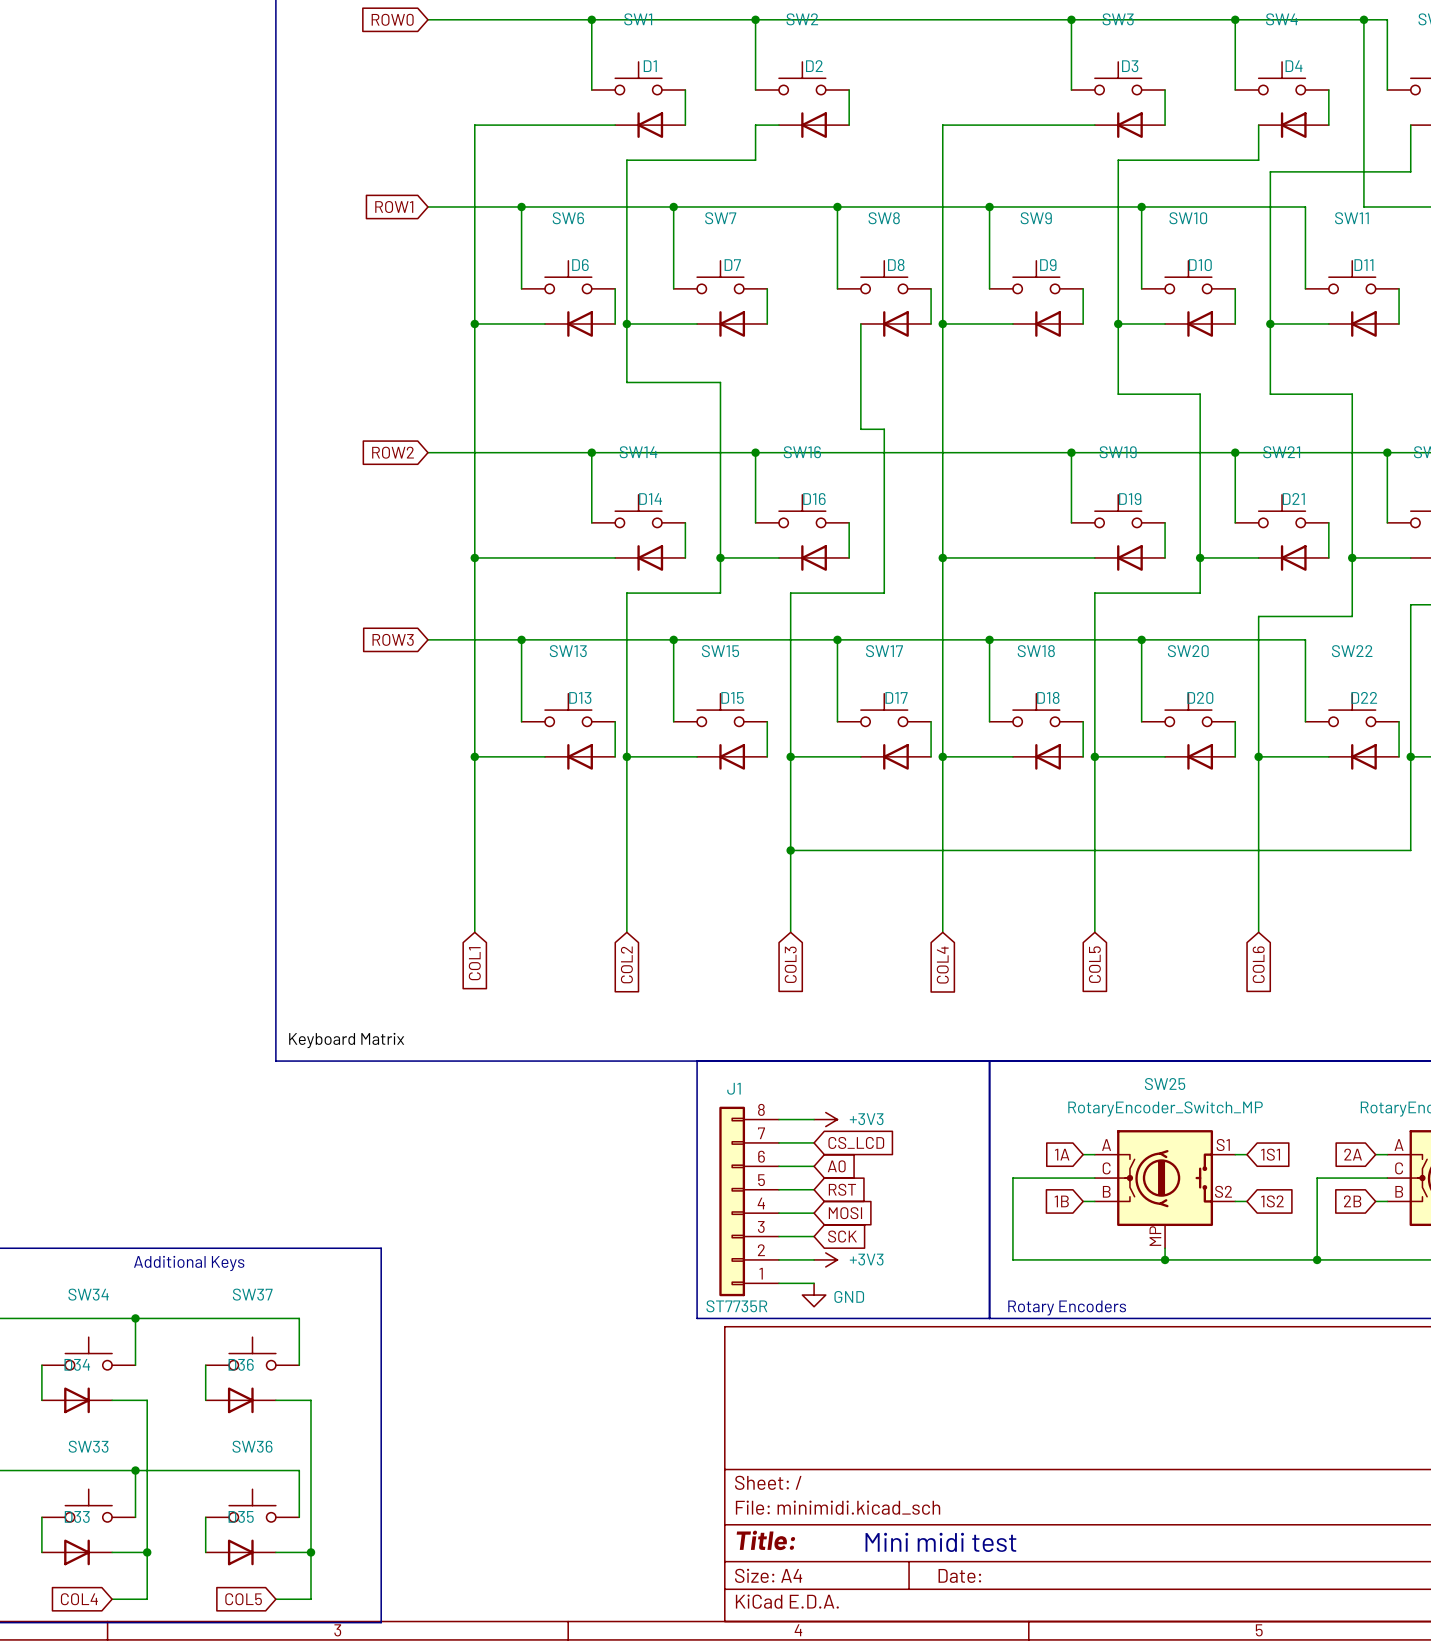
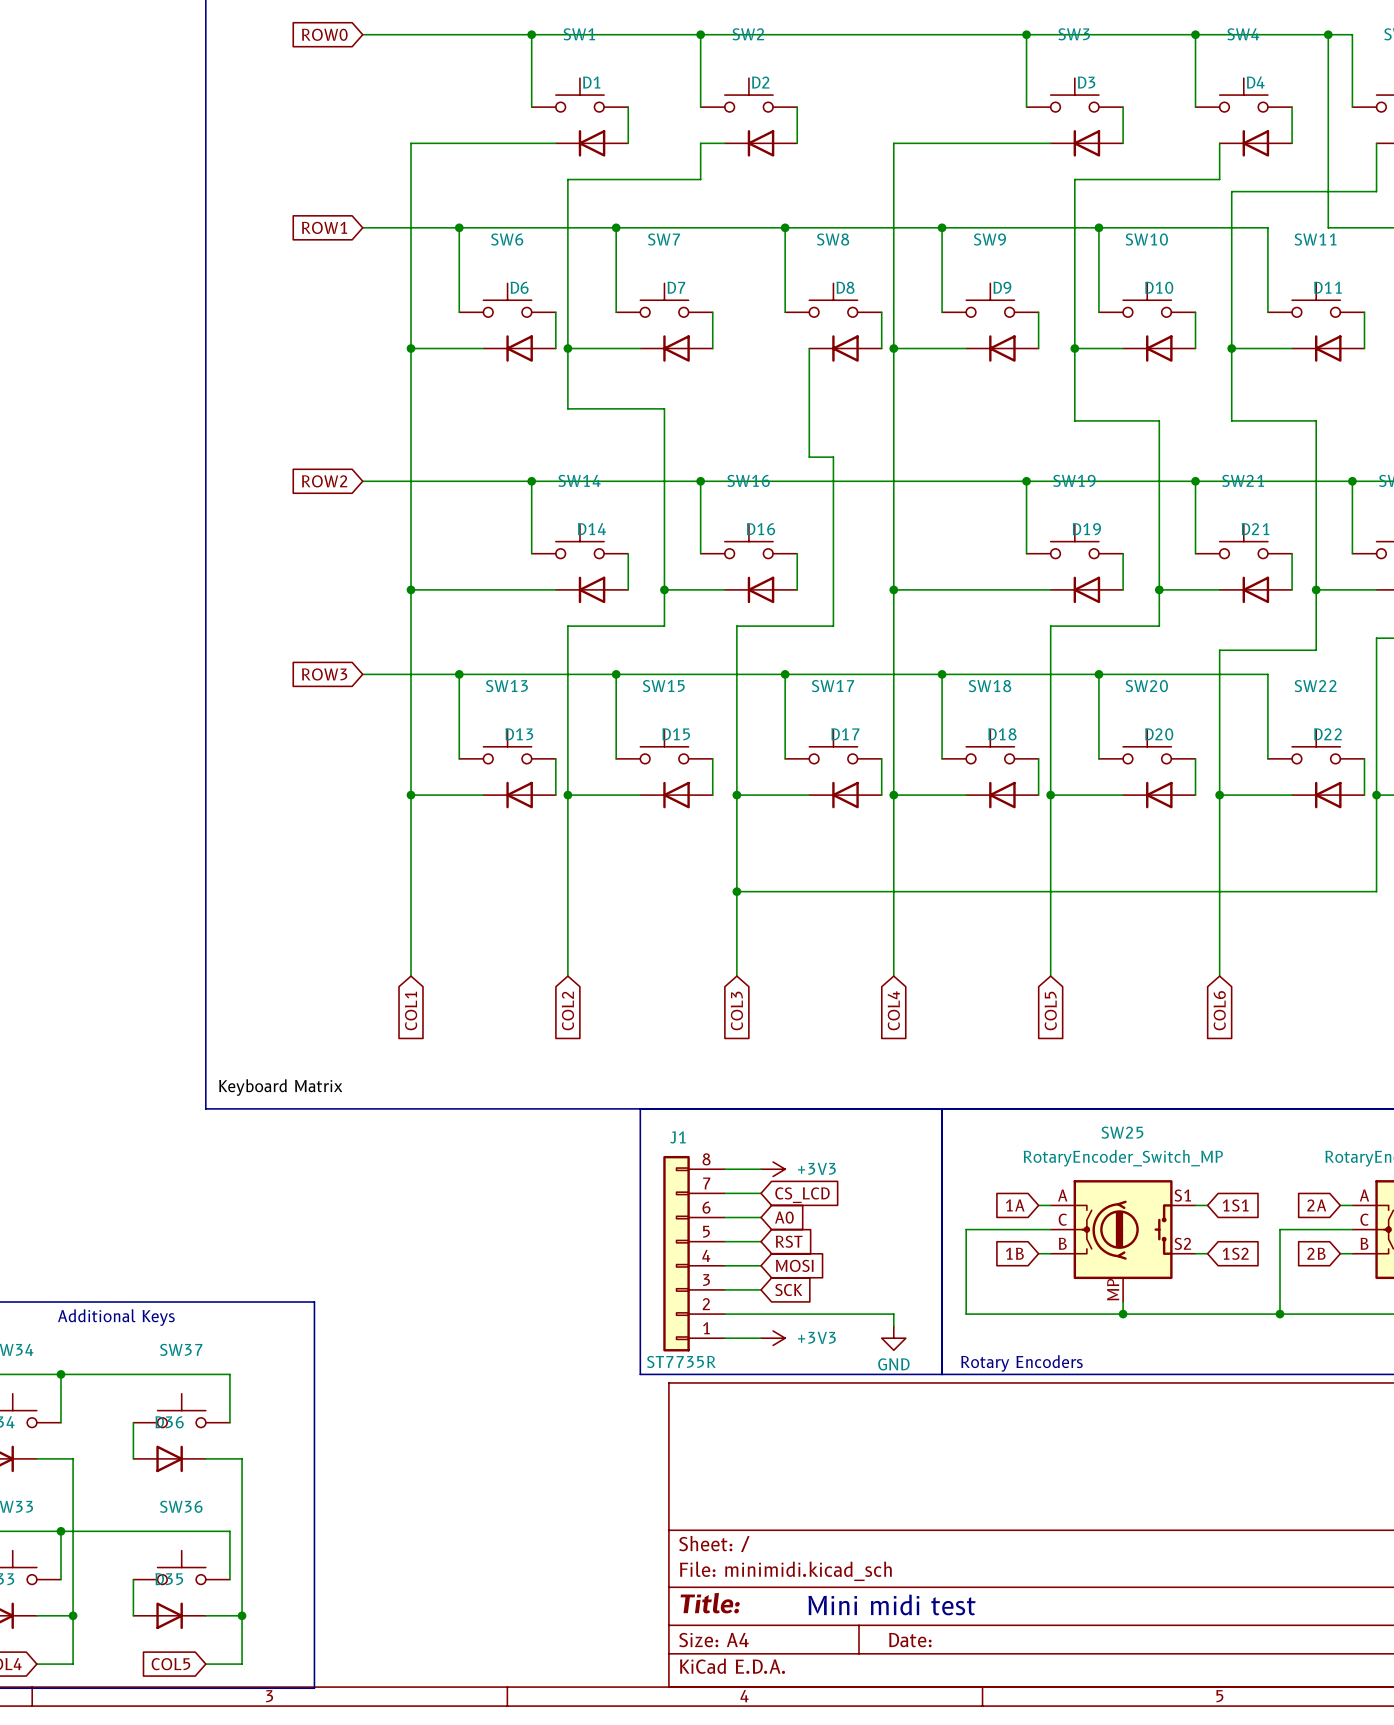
wire: none -> (761, 1314) (893, 1314) (893, 1326)
power symbol position: +3V3 (825, 1259) -> +3V3 (773, 1338)
power symbol position: GND (814, 1295) -> GND (893, 1338)
power symbol text position: GND (849, 1296) -> GND (893, 1364)

